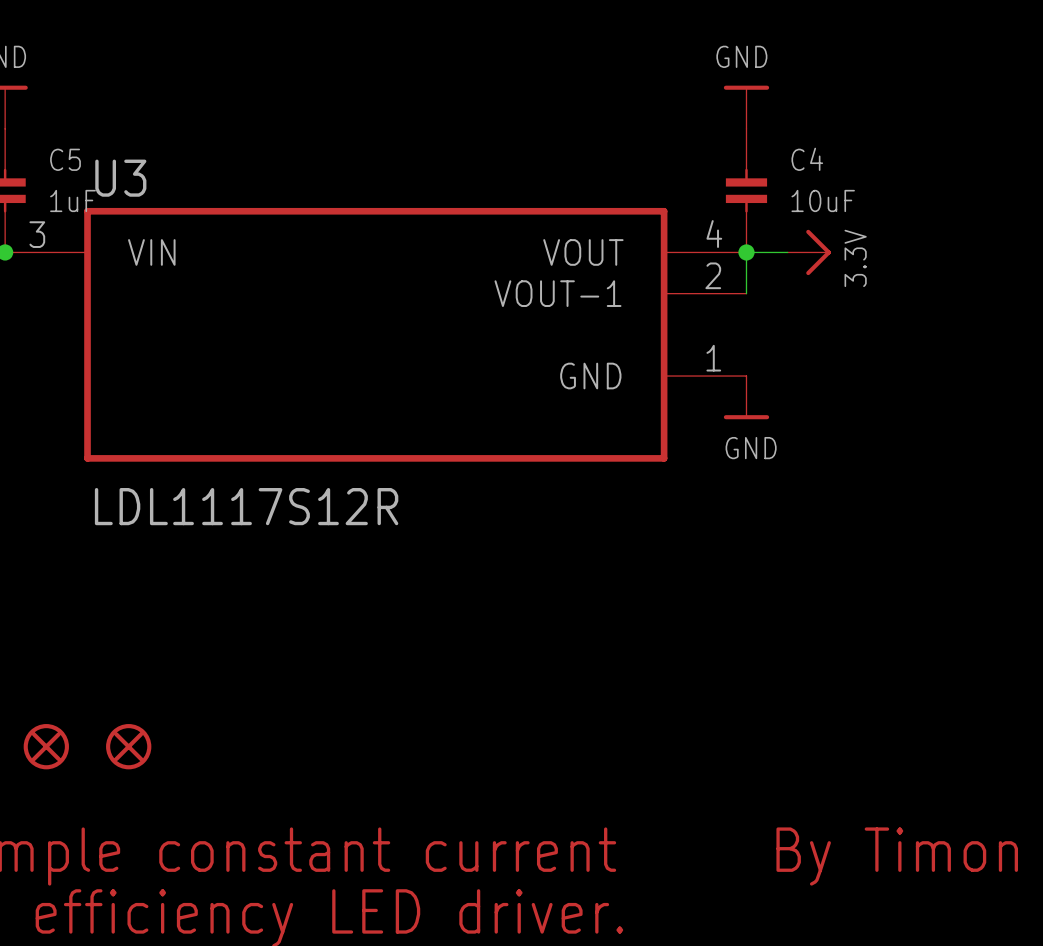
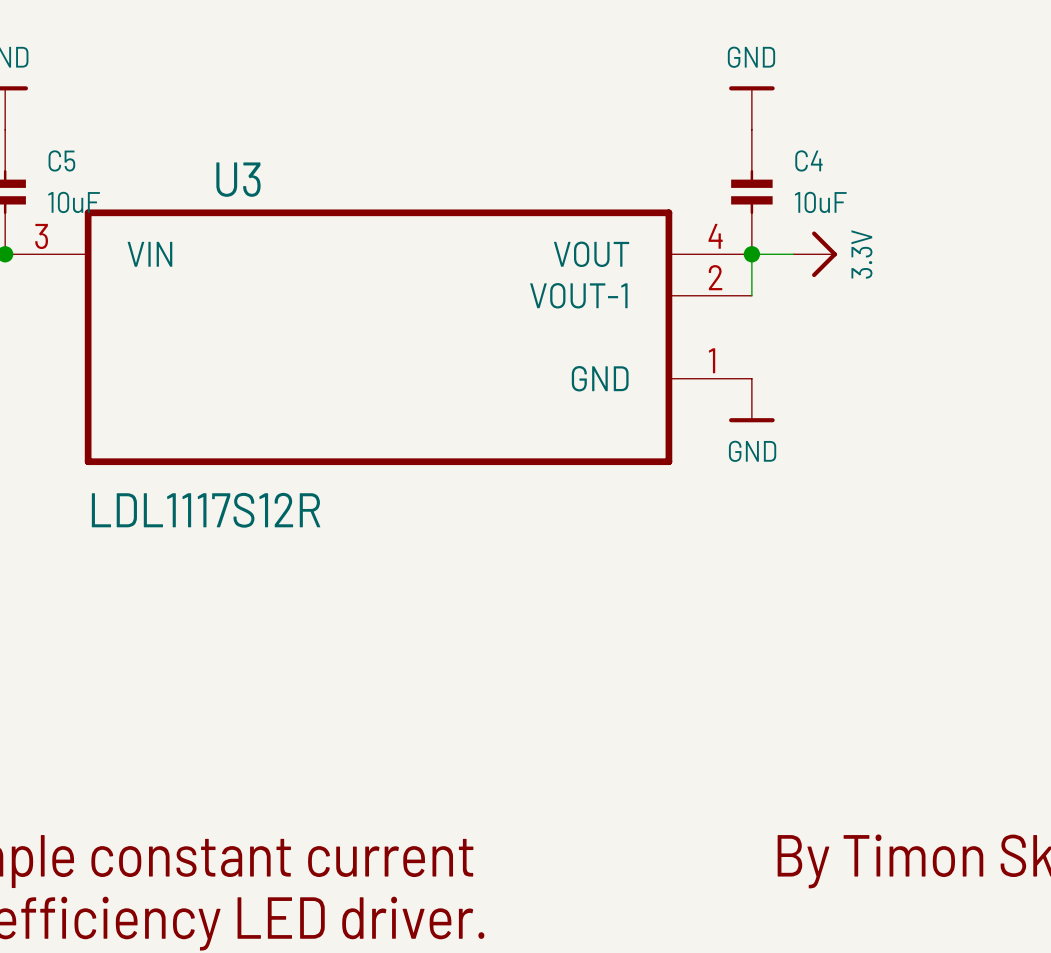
U3 name position: U3 (120, 178) -> U3 (238, 179)
C5 value: 1uF (73, 200) -> 10uF (74, 202)
part: (46, 746) -> none
part: (128, 746) -> none

